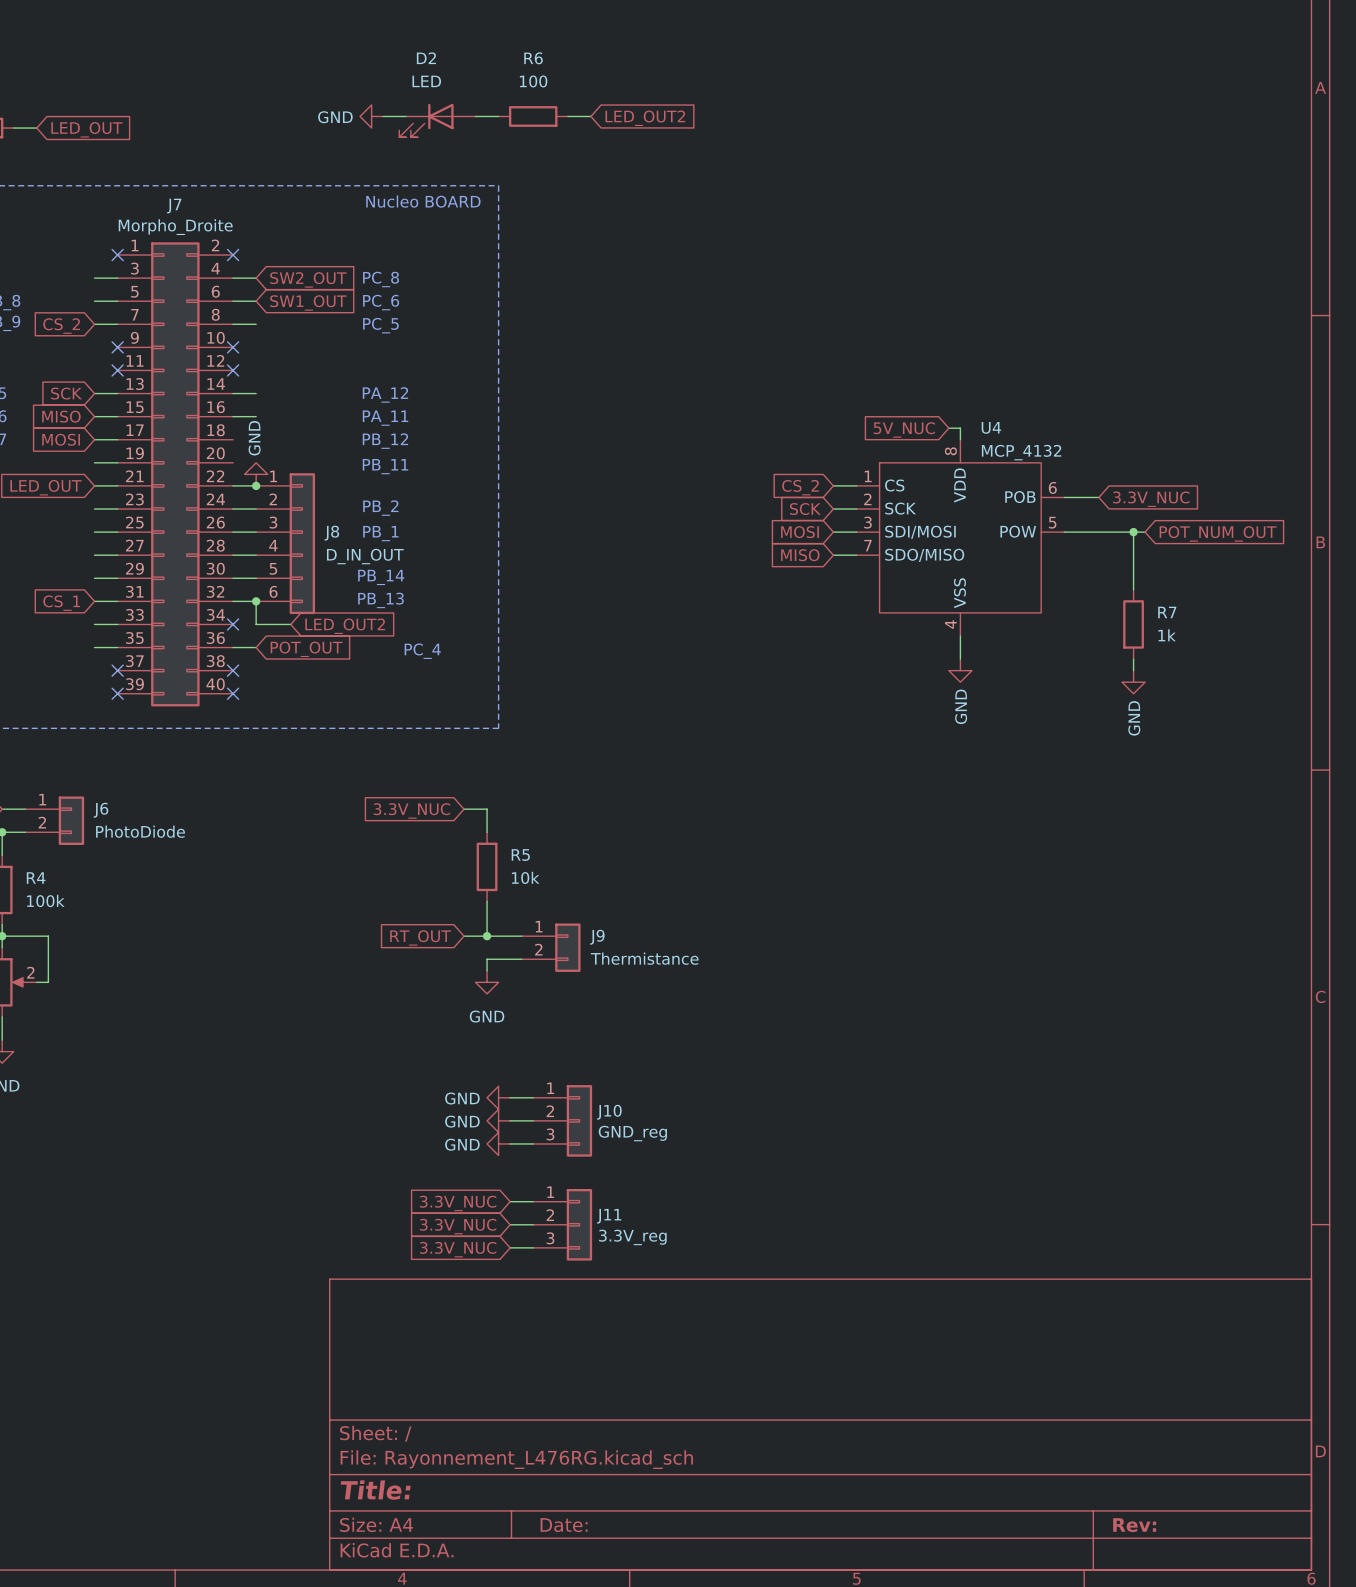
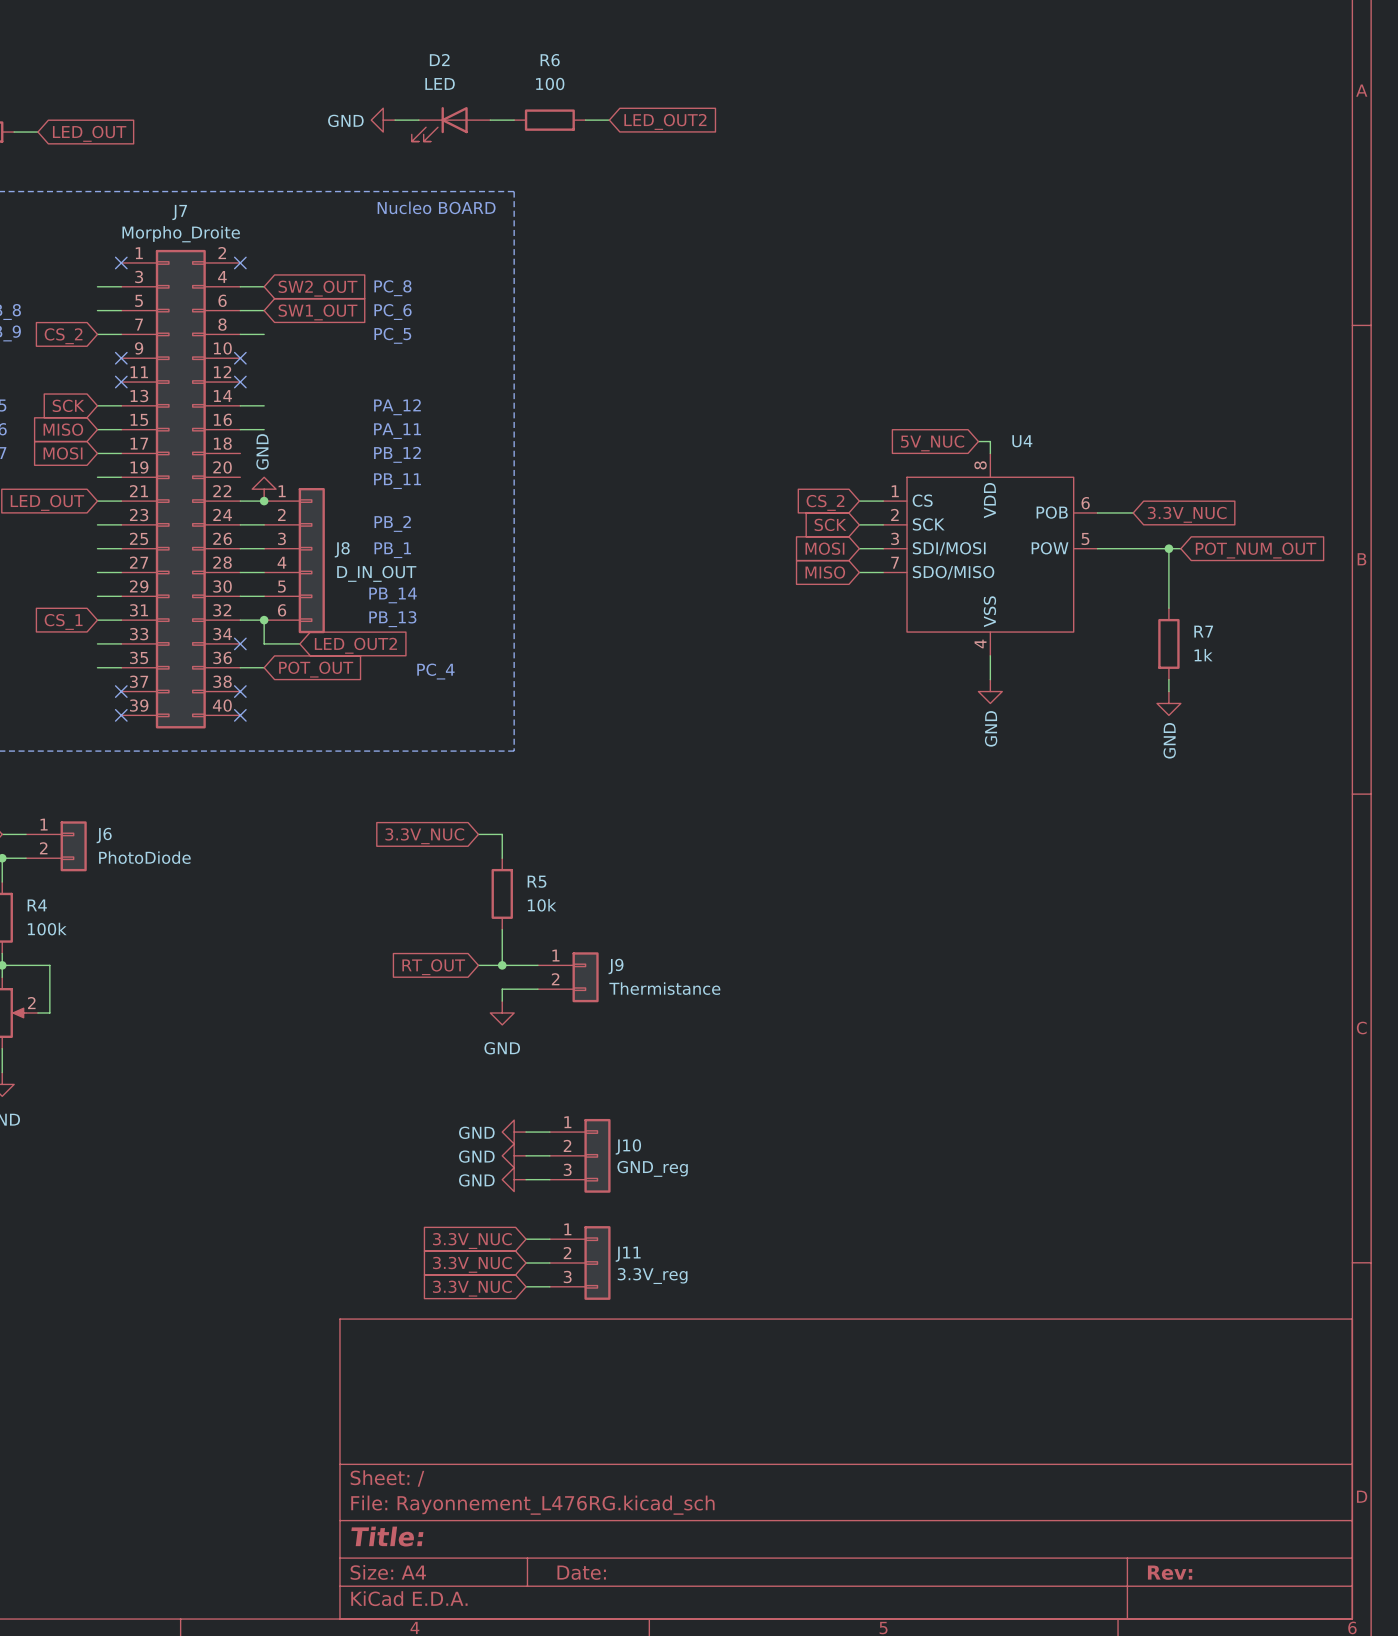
U4 value: MCP_4132 (1021, 452) -> none

